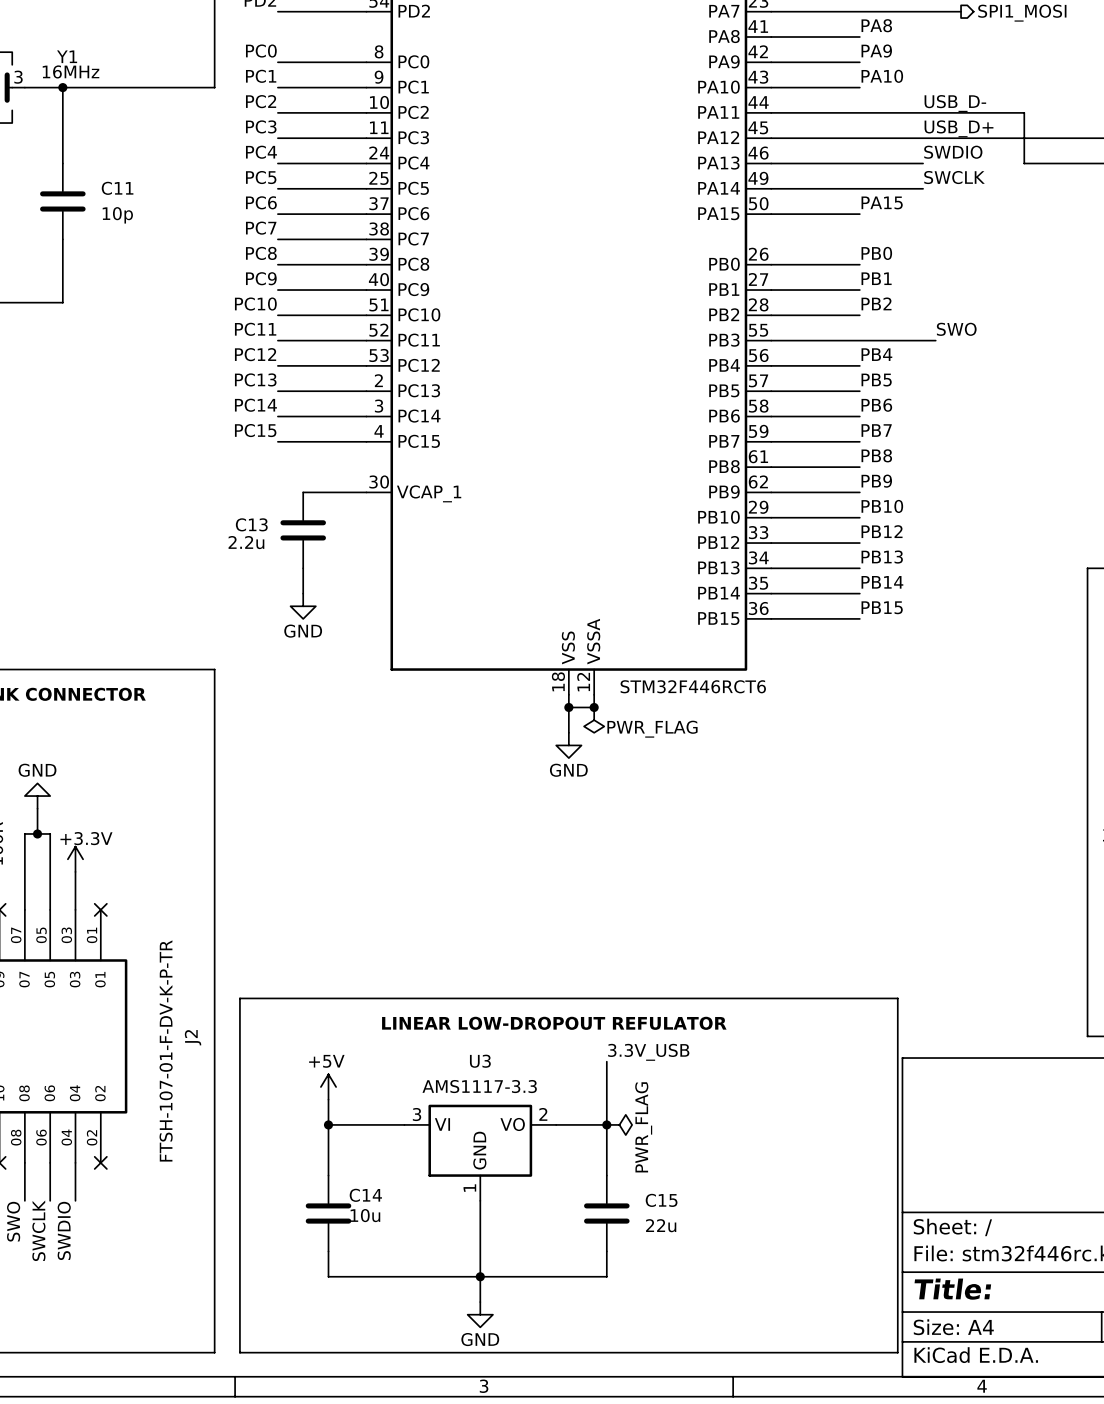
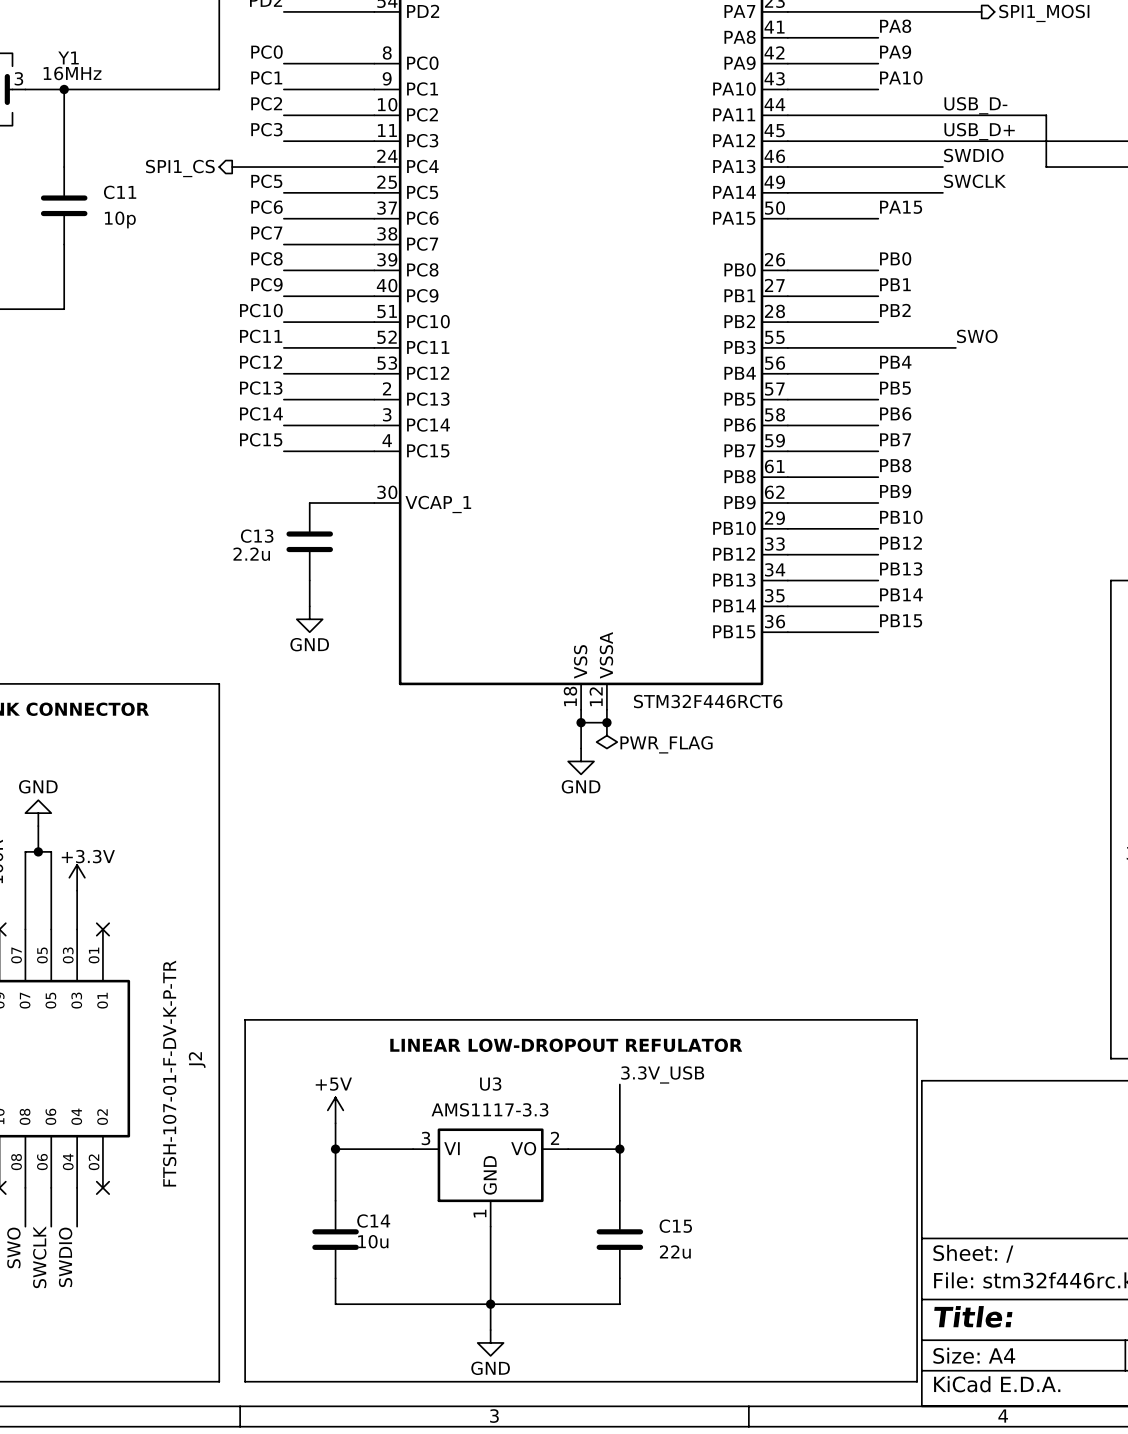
label: PC4 (261, 152) -> none
wire: none -> (232, 167) (283, 167)
hierarchical label: none -> SPI1_CS (180, 168)
power symbol: PWR_FLAG (619, 1124) -> none

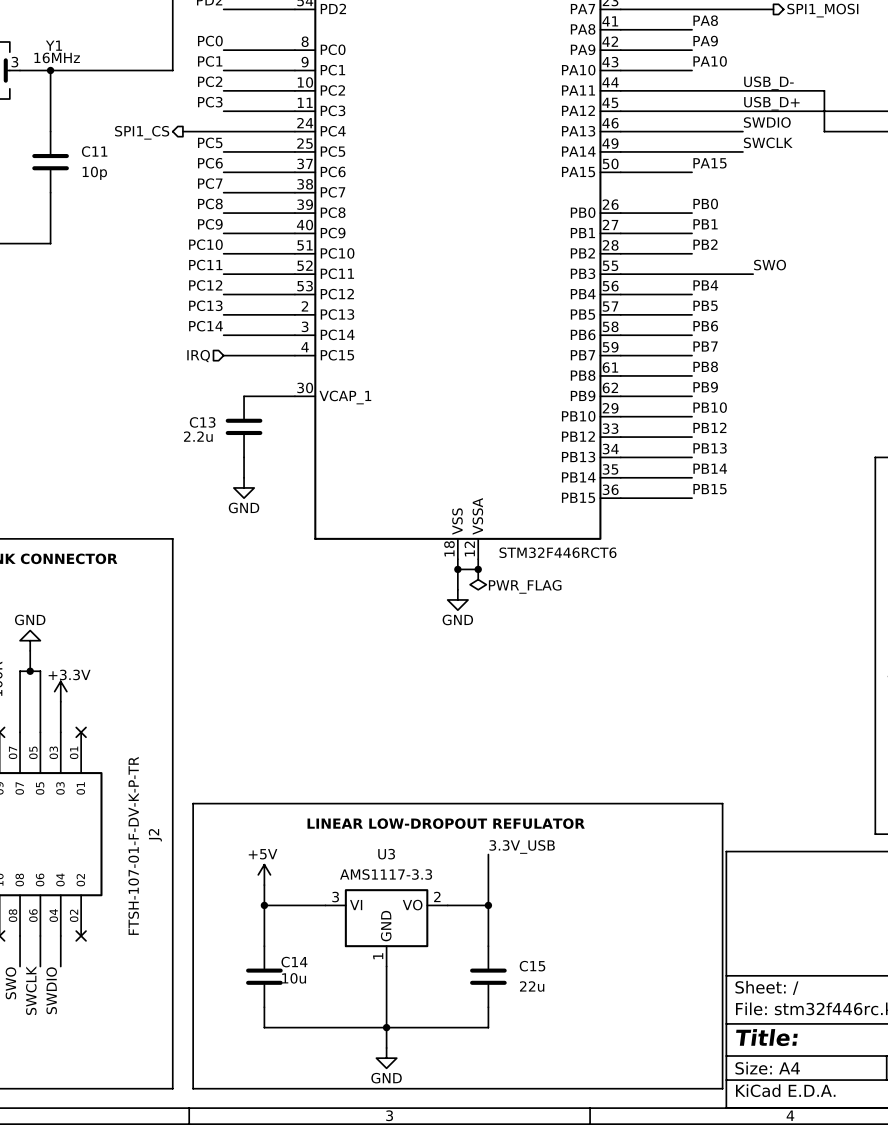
label: PC15 (261, 439) -> none
hierarchical label: none -> IRQ (198, 356)

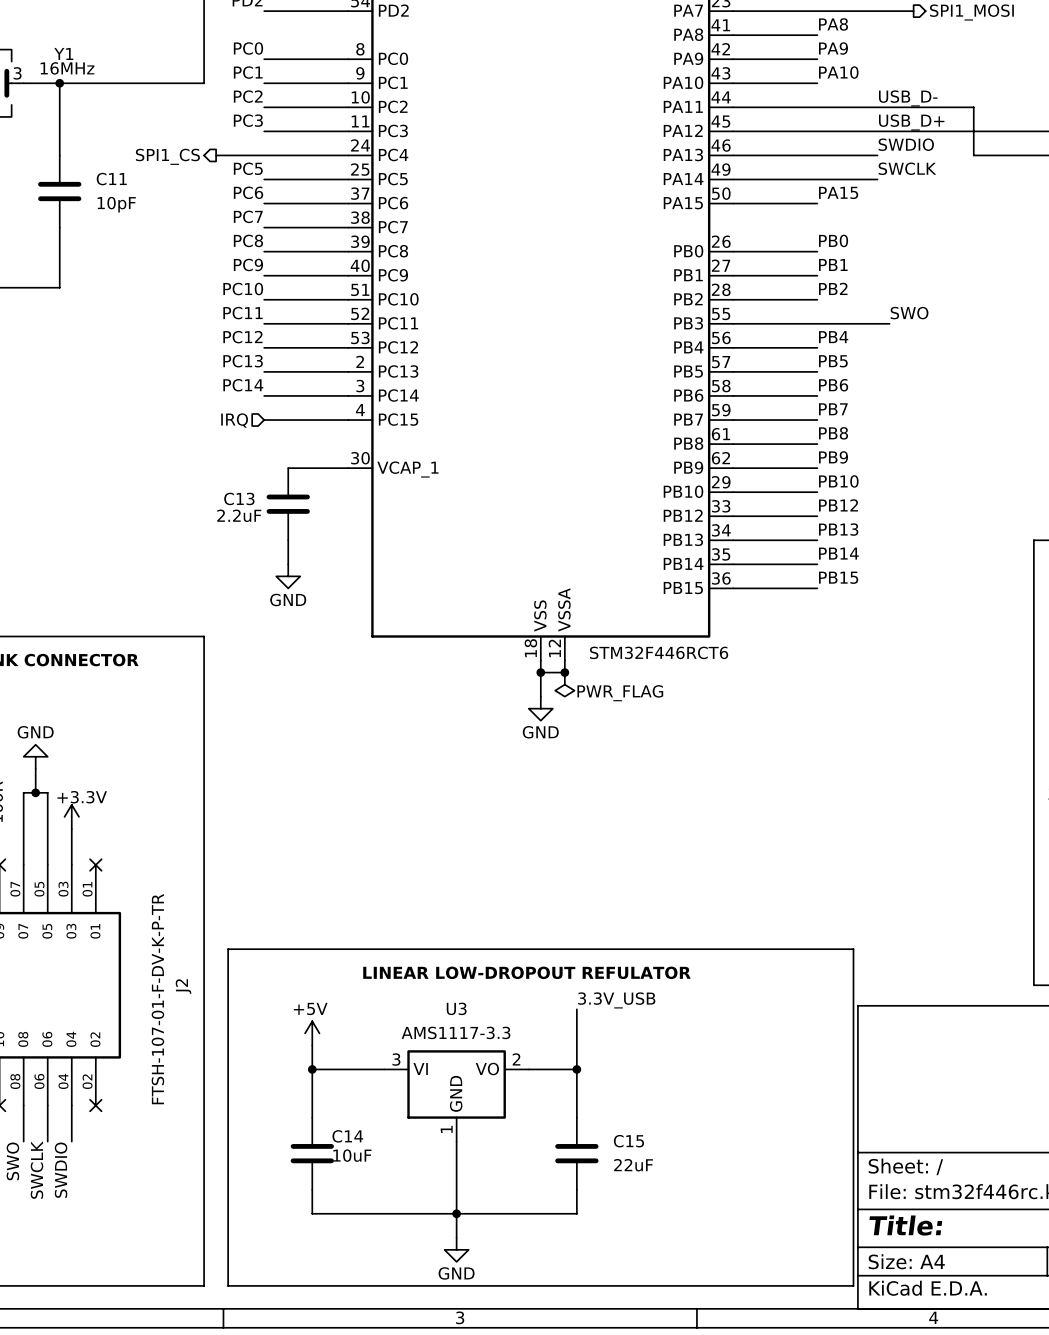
C11 value: 10p (94, 173) -> 10pF (116, 204)
C13 value: 2.2u (198, 436) -> 2.2uF (239, 515)
C14 value: 10u (294, 978) -> 10uF (352, 1155)
C15 value: 22u (532, 986) -> 22uF (633, 1165)

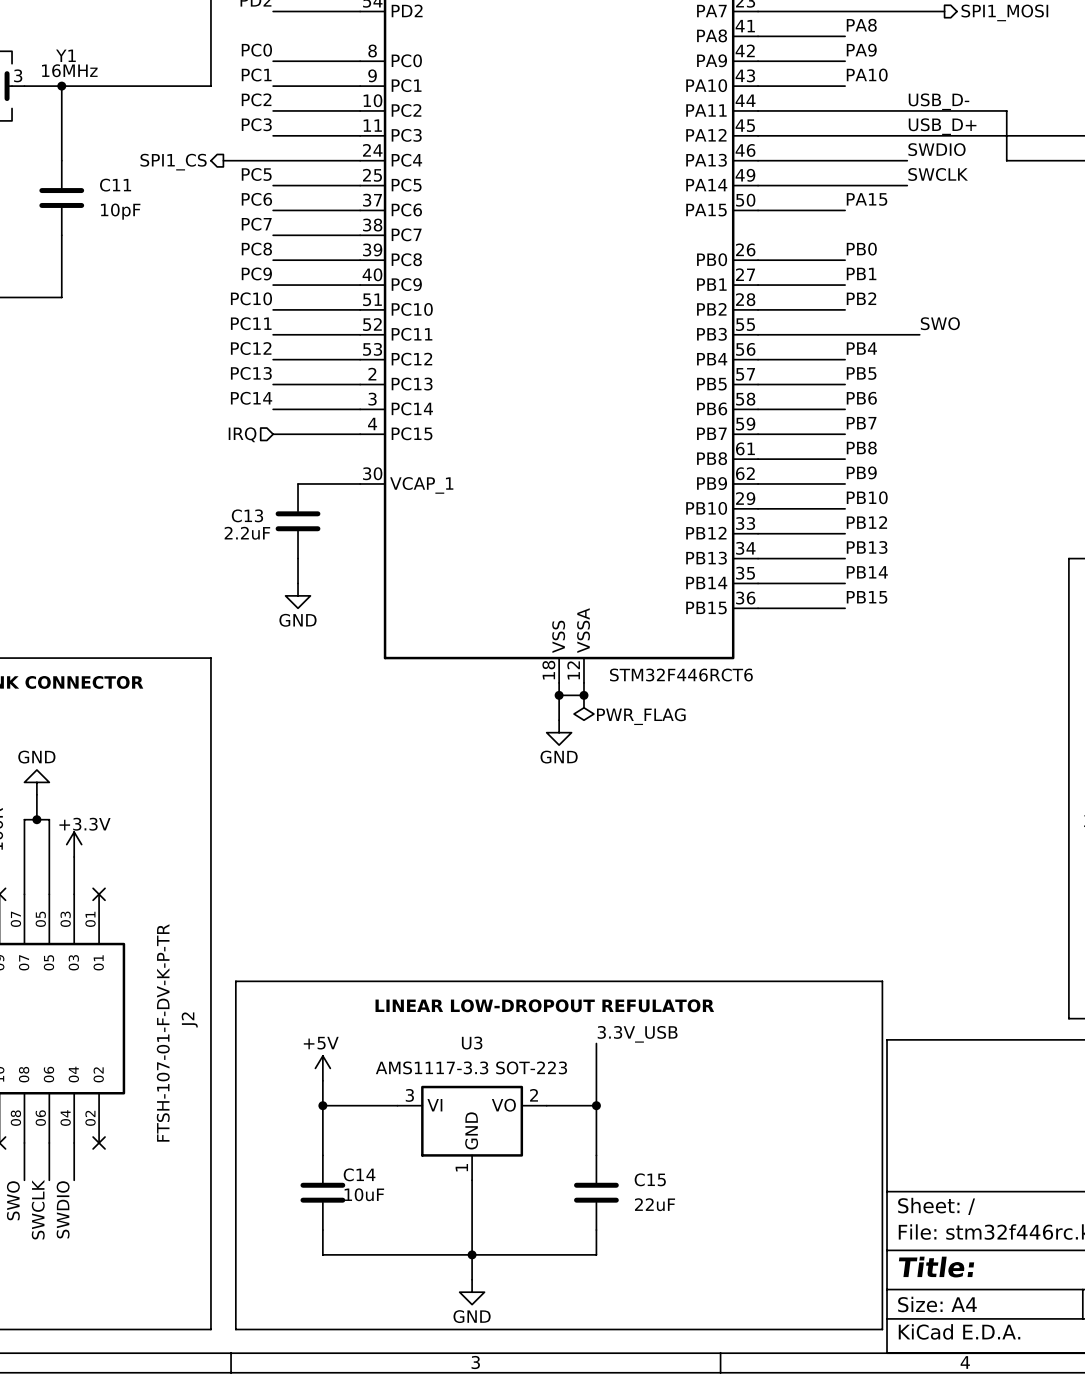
U3 value: AMS1117-3.3 (456, 1032) -> AMS1117-3.3 SOT-223 (471, 1067)

